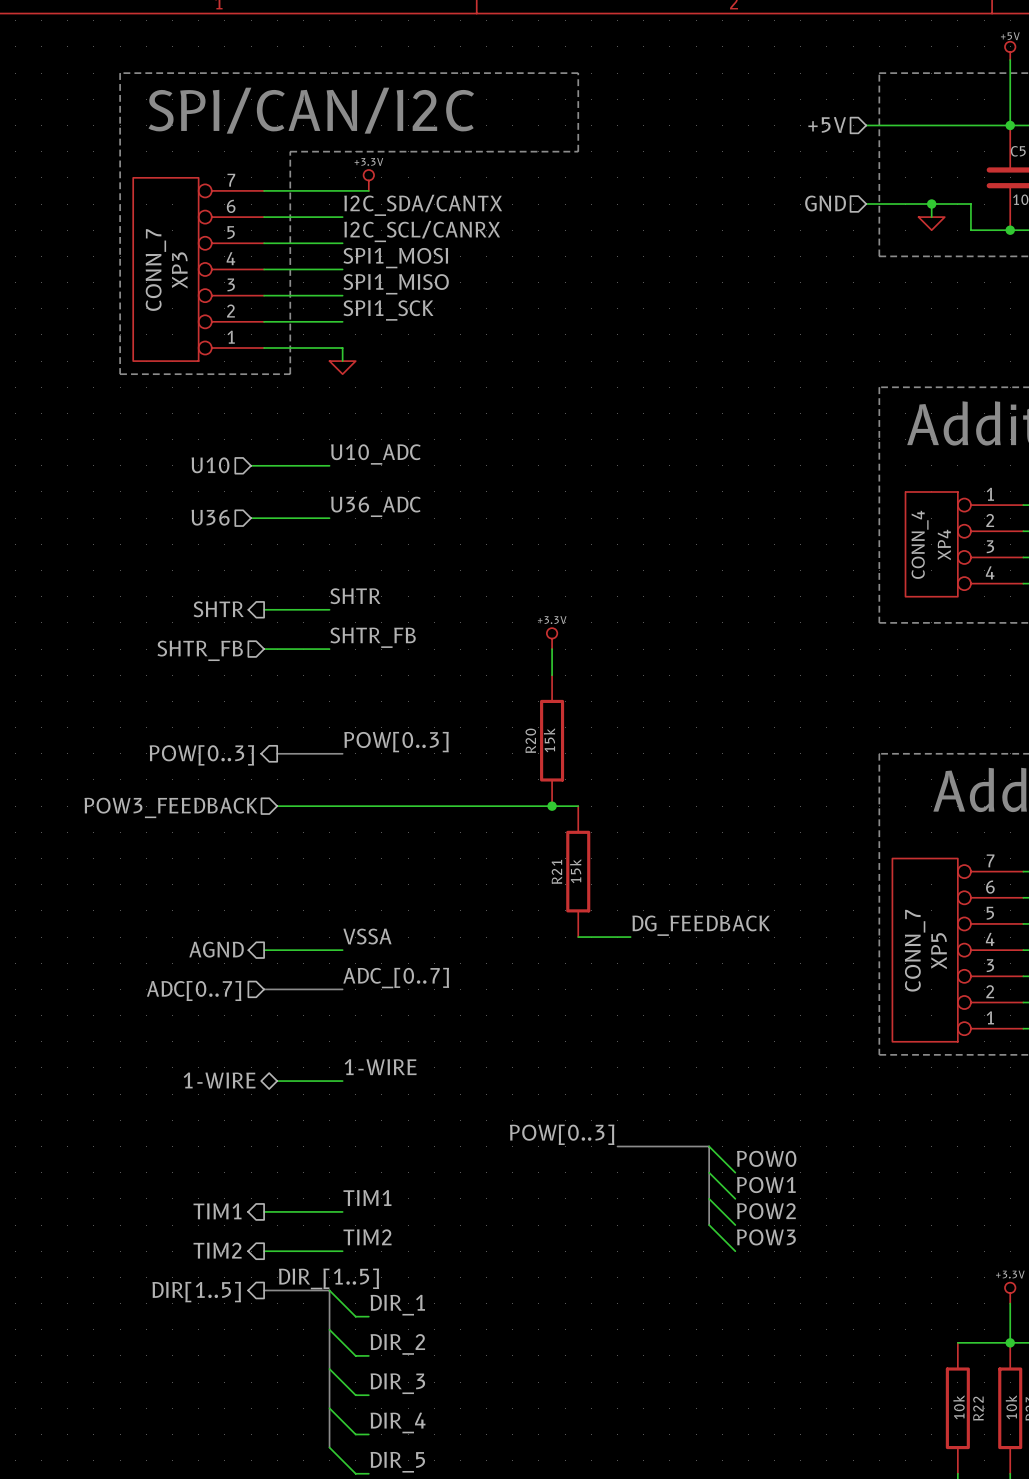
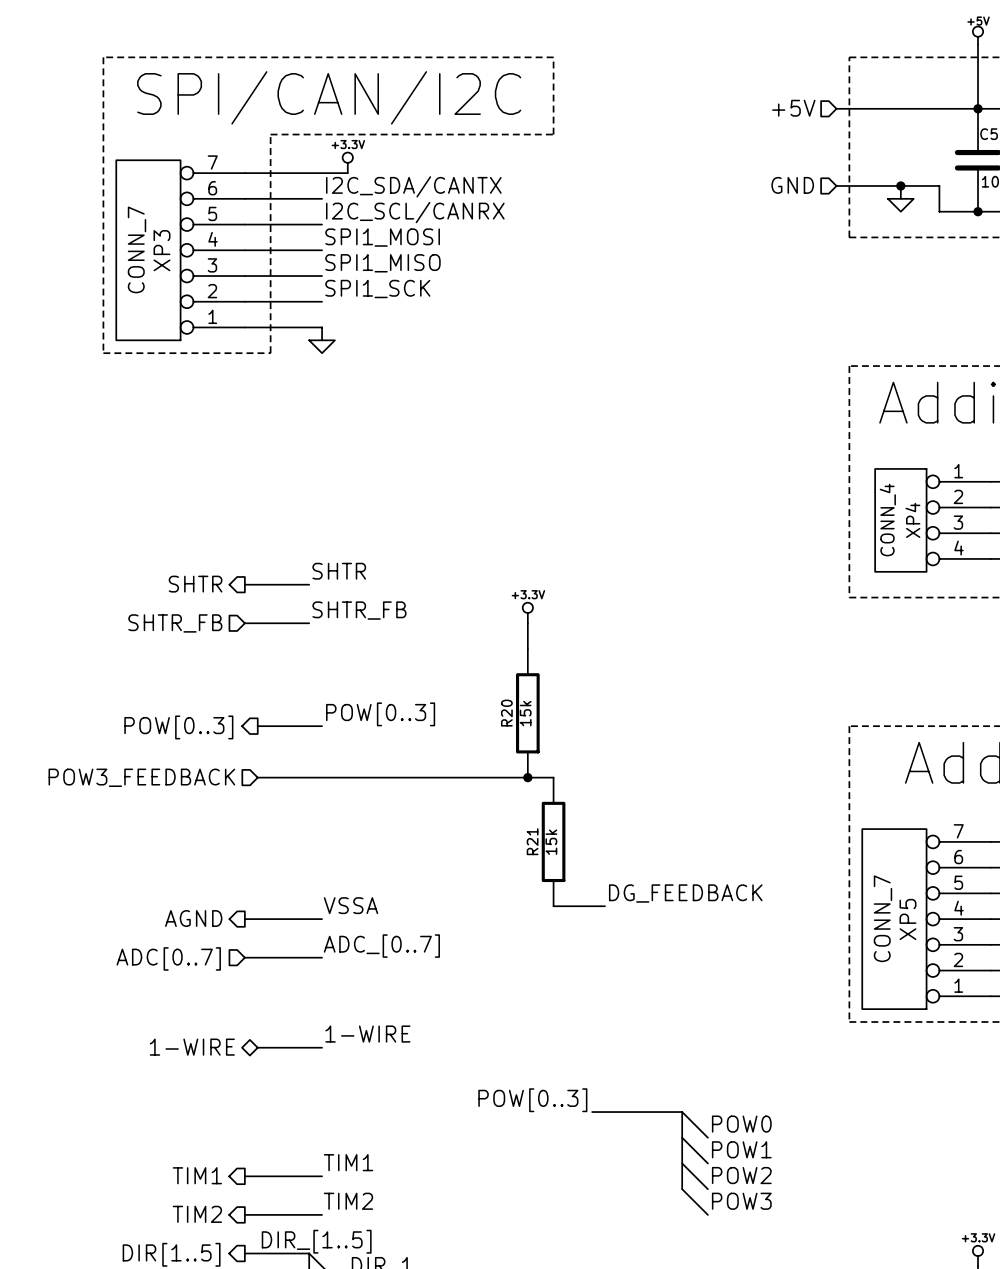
label: U10_ADC (375, 454) -> none
hierarchical label: U10 (210, 465) -> none
wire: (251, 465) (329, 465) -> none
label: U36_ADC (375, 506) -> none
hierarchical label: U36 (210, 517) -> none
wire: (251, 518) (329, 518) -> none

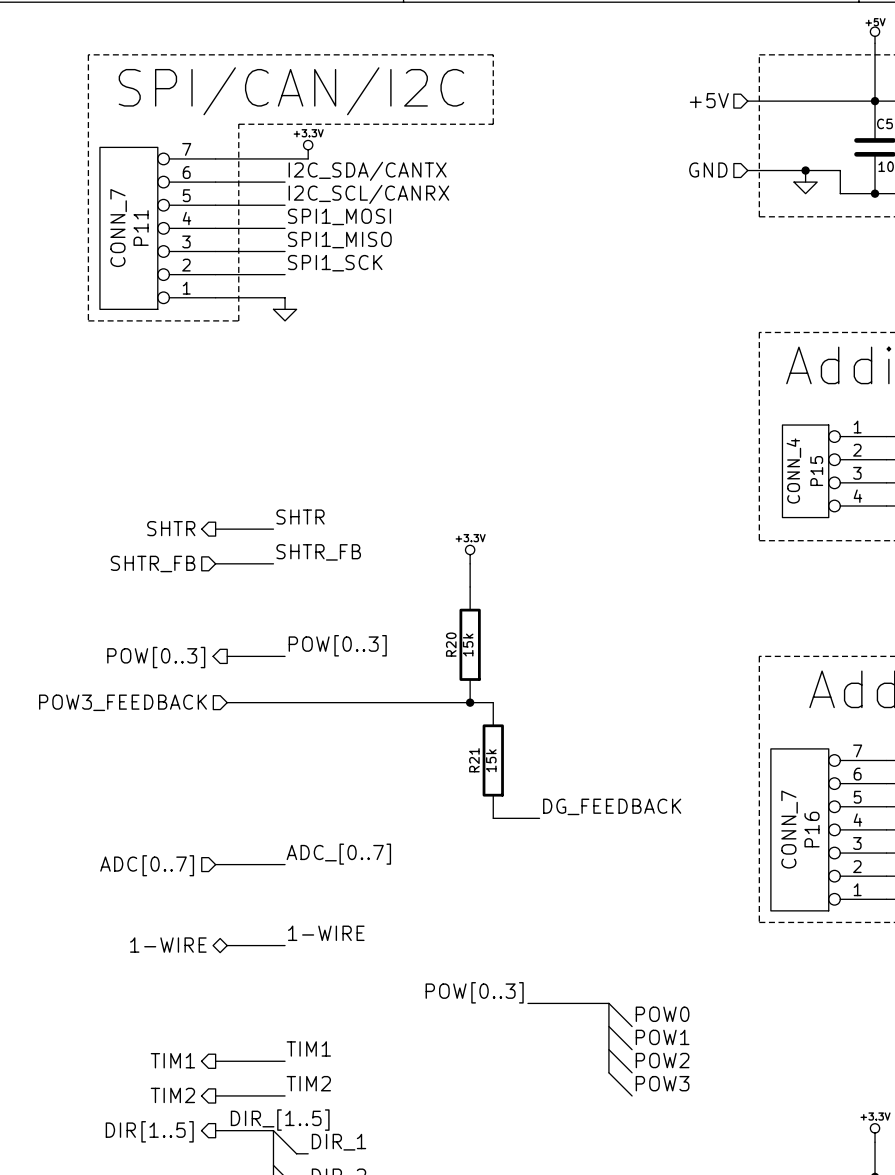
XP3 name: XP3 (161, 250) -> P11 (141, 228)
XP4 name: XP4 (912, 520) -> P15 (816, 471)
label: VSSA (351, 905) -> none
hierarchical label: AGND (193, 918) -> none
wire: (244, 919) (322, 919) -> none
XP5 name: XP5 (907, 919) -> P16 (812, 829)

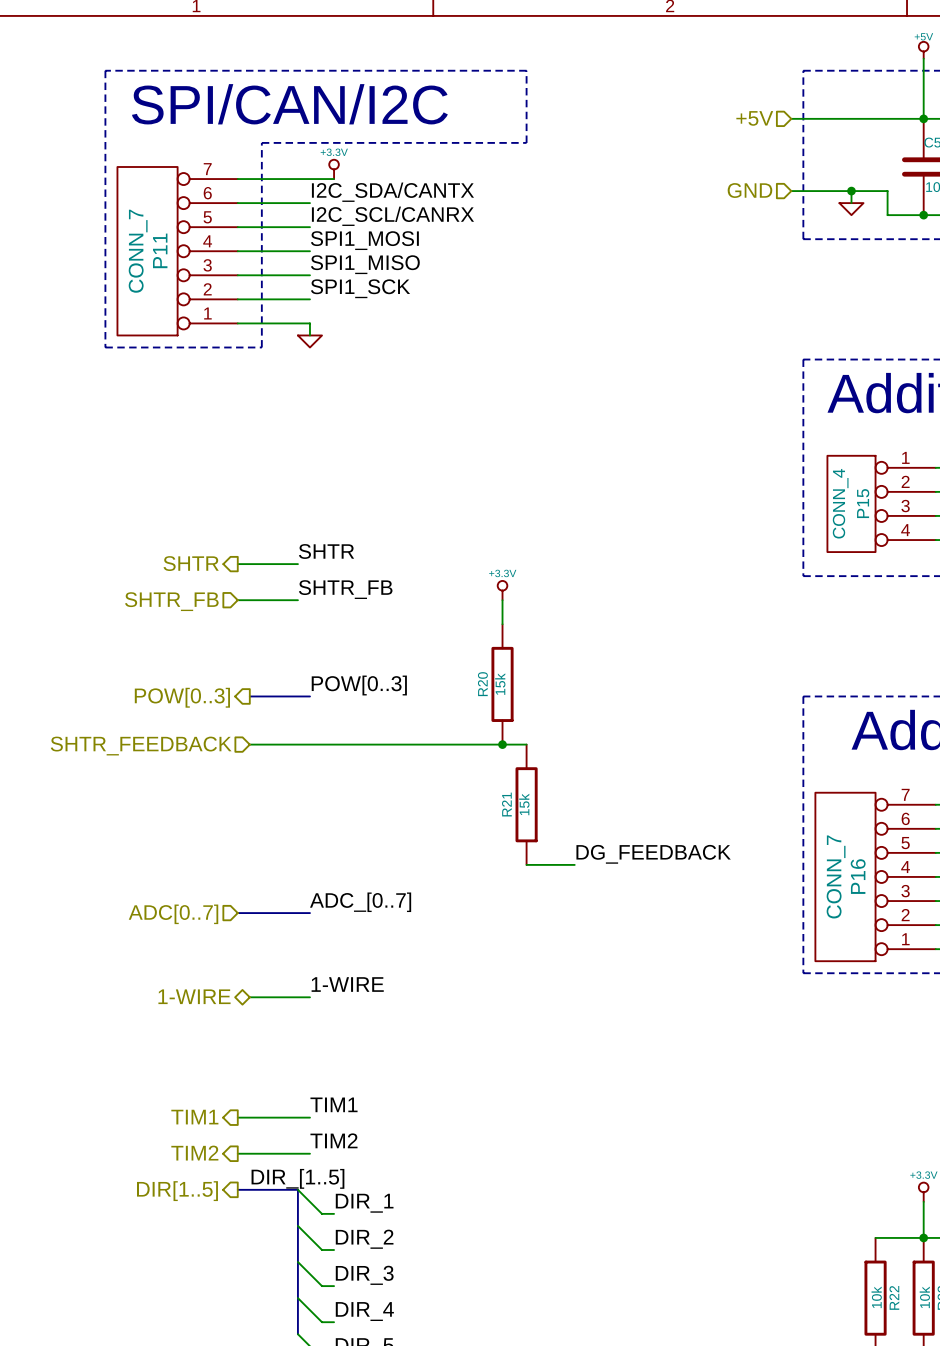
hierarchical label: POW3_FEEDBACK (123, 702) -> SHTR_FEEDBACK (141, 746)
label: POW[0..3] (474, 992) -> none
bus: (527, 1003) (608, 1003) (608, 1072) -> none
wire: (608, 1003) (632, 1026) -> none
label: POW0 (662, 1014) -> none
wire: (608, 1026) (632, 1049) -> none
label: POW1 (662, 1037) -> none
wire: (608, 1049) (632, 1072) -> none
label: POW2 (662, 1060) -> none
wire: (608, 1072) (632, 1095) -> none
label: POW3 (662, 1083) -> none

